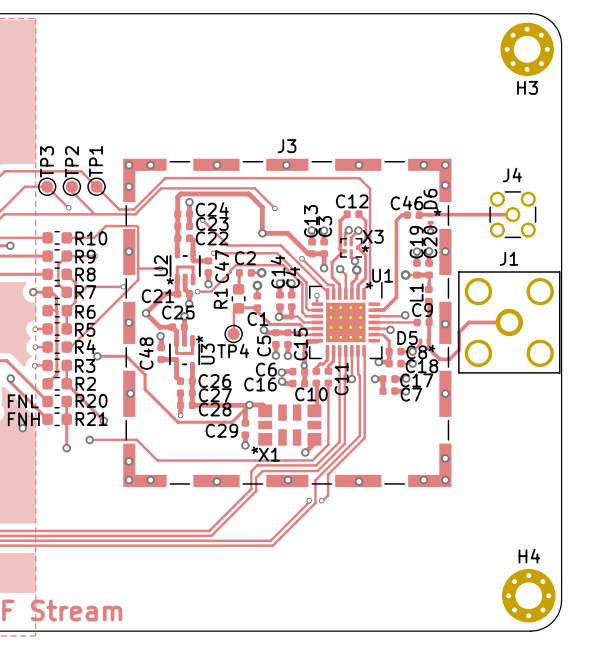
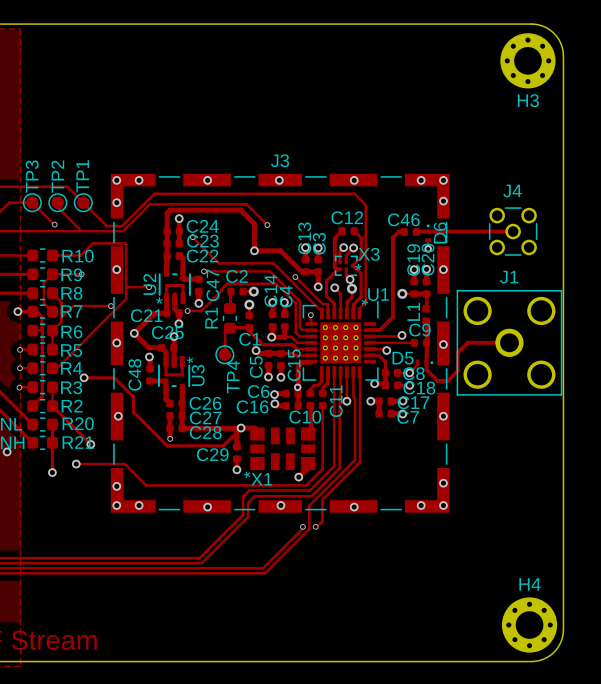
D6 footprint: [427, 213, 434, 225] -> [425, 224, 432, 243]
D5 footprint: [418, 338, 431, 345] -> [415, 359, 434, 366]
TP4 name rotation: 0° (233, 351) -> 90° counterclockwise (233, 377)

